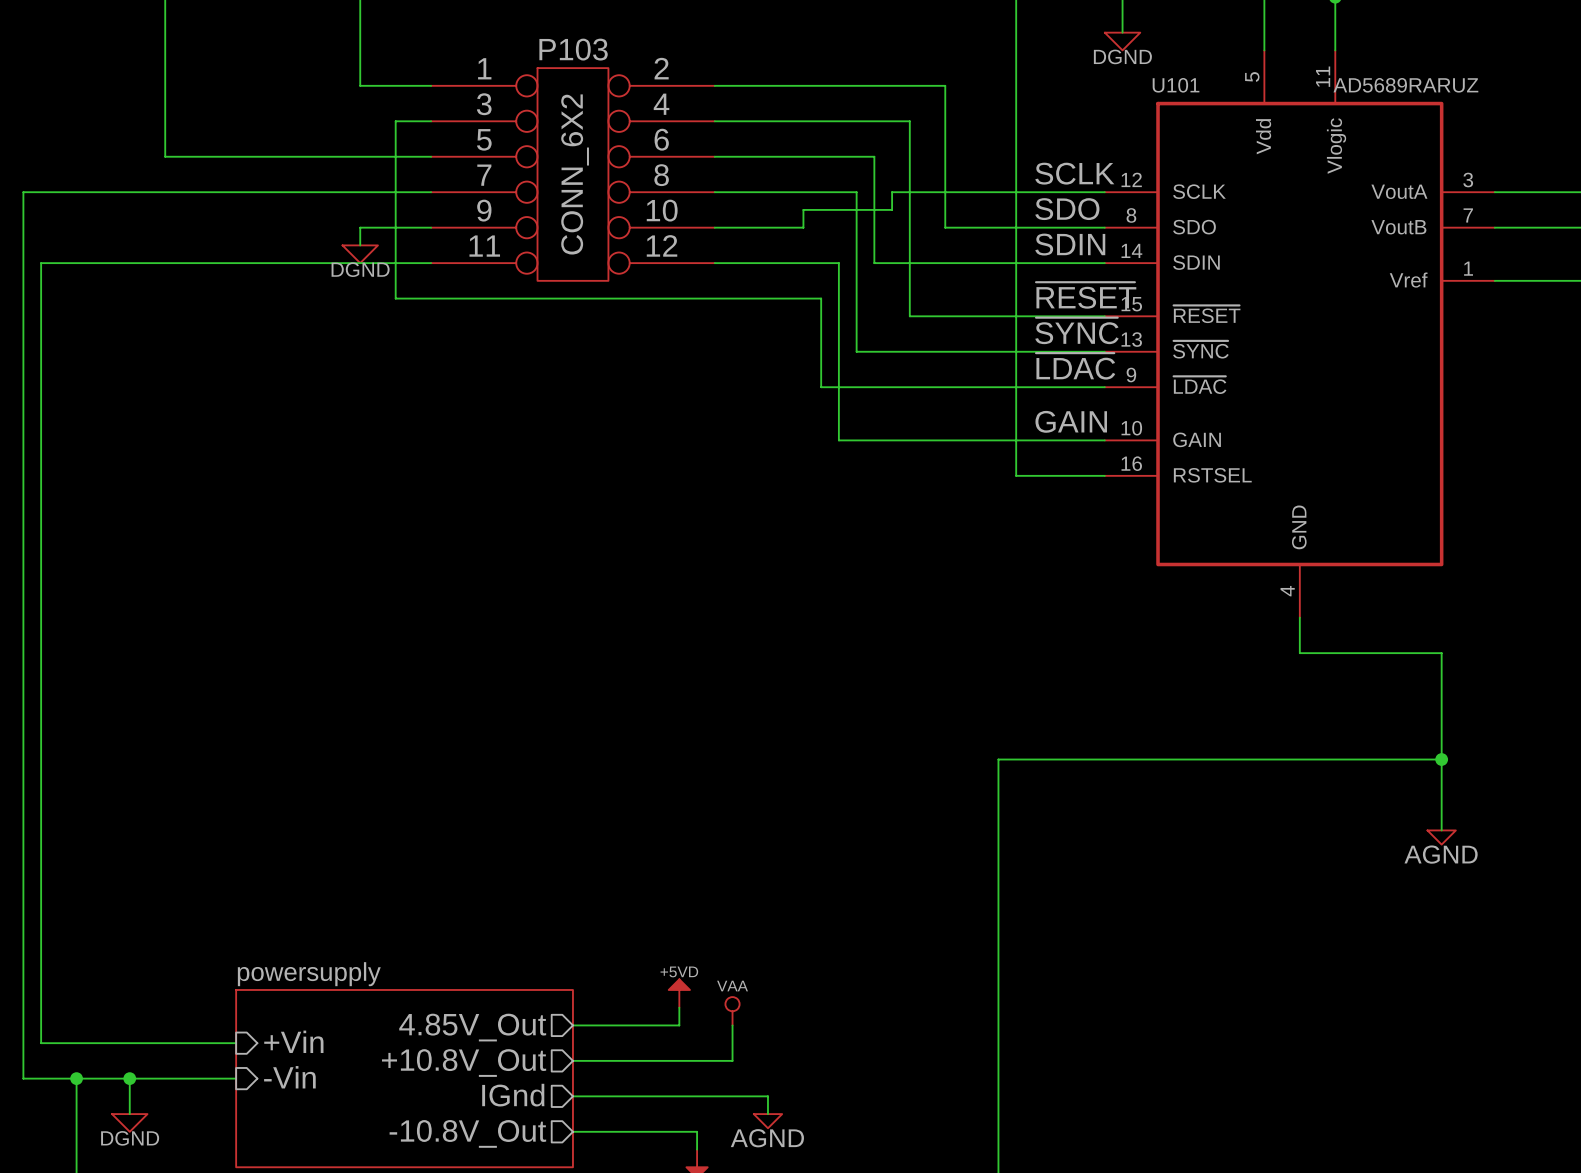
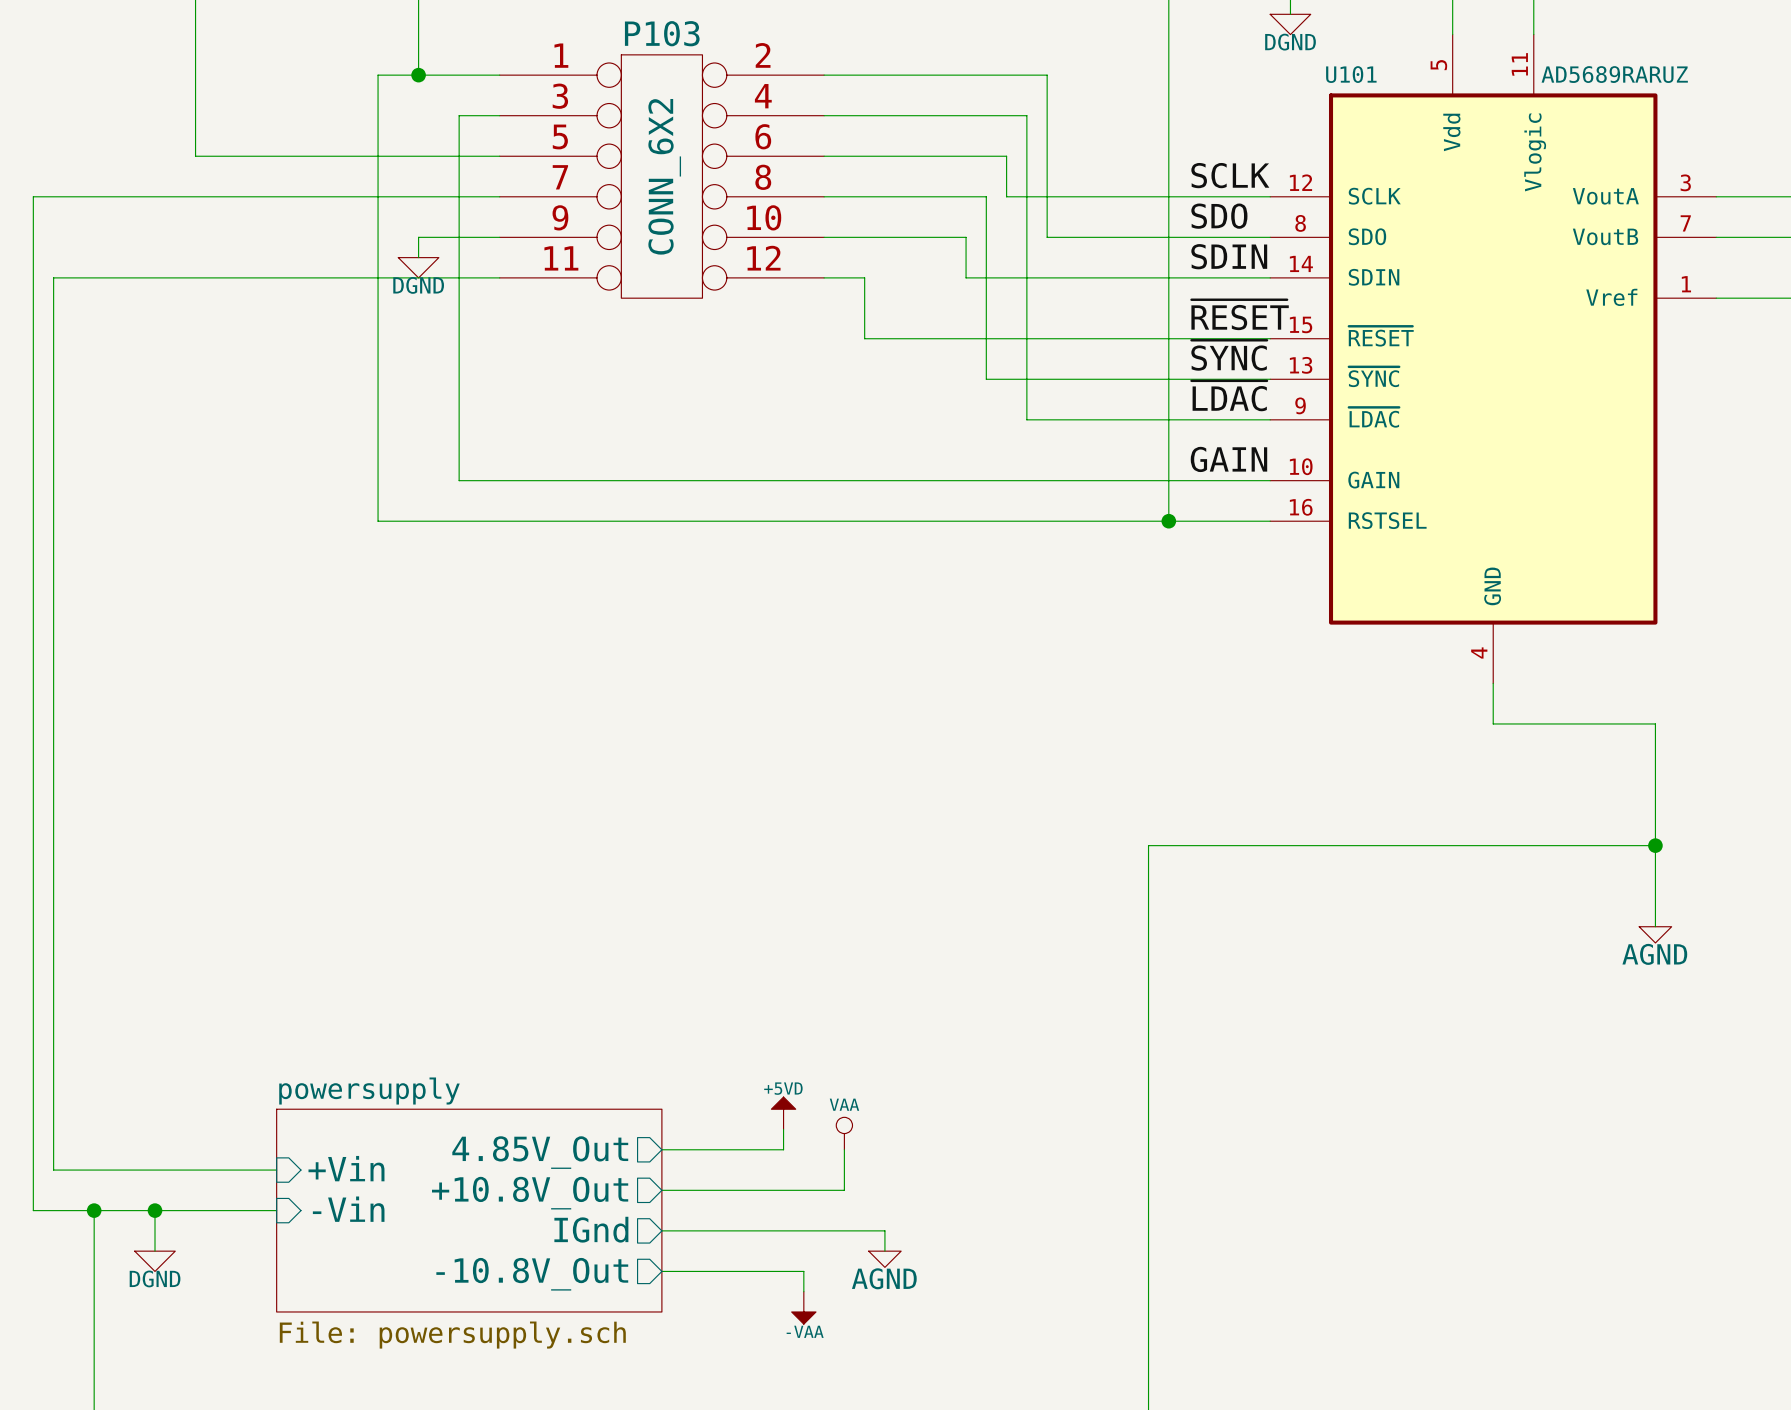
wire: none -> (418, 75) (378, 75) (378, 521) (1168, 521)
junction: none -> (418, 75)
wire: (909, 85) (945, 85) (945, 227) -> none
wire: (892, 121) (909, 121) -> (1047, 75) (1047, 115)
wire: (874, 192) (874, 263) -> (1006, 196) (1026, 196) (1026, 115)
wire: (892, 209) (803, 209) (803, 227) -> (1006, 277) (966, 277) (966, 237) (925, 237)
wire: none -> (1026, 217) (1026, 419)
wire: (909, 227) (909, 316) -> (1047, 237) (1087, 237)
wire: (750, 263) (838, 263) (838, 440) -> (864, 277) (864, 338) (1047, 338)
wire: (395, 298) (821, 298) (821, 387) (892, 387) -> (459, 318) (459, 480) (966, 480)
junction: none -> (1168, 521)

